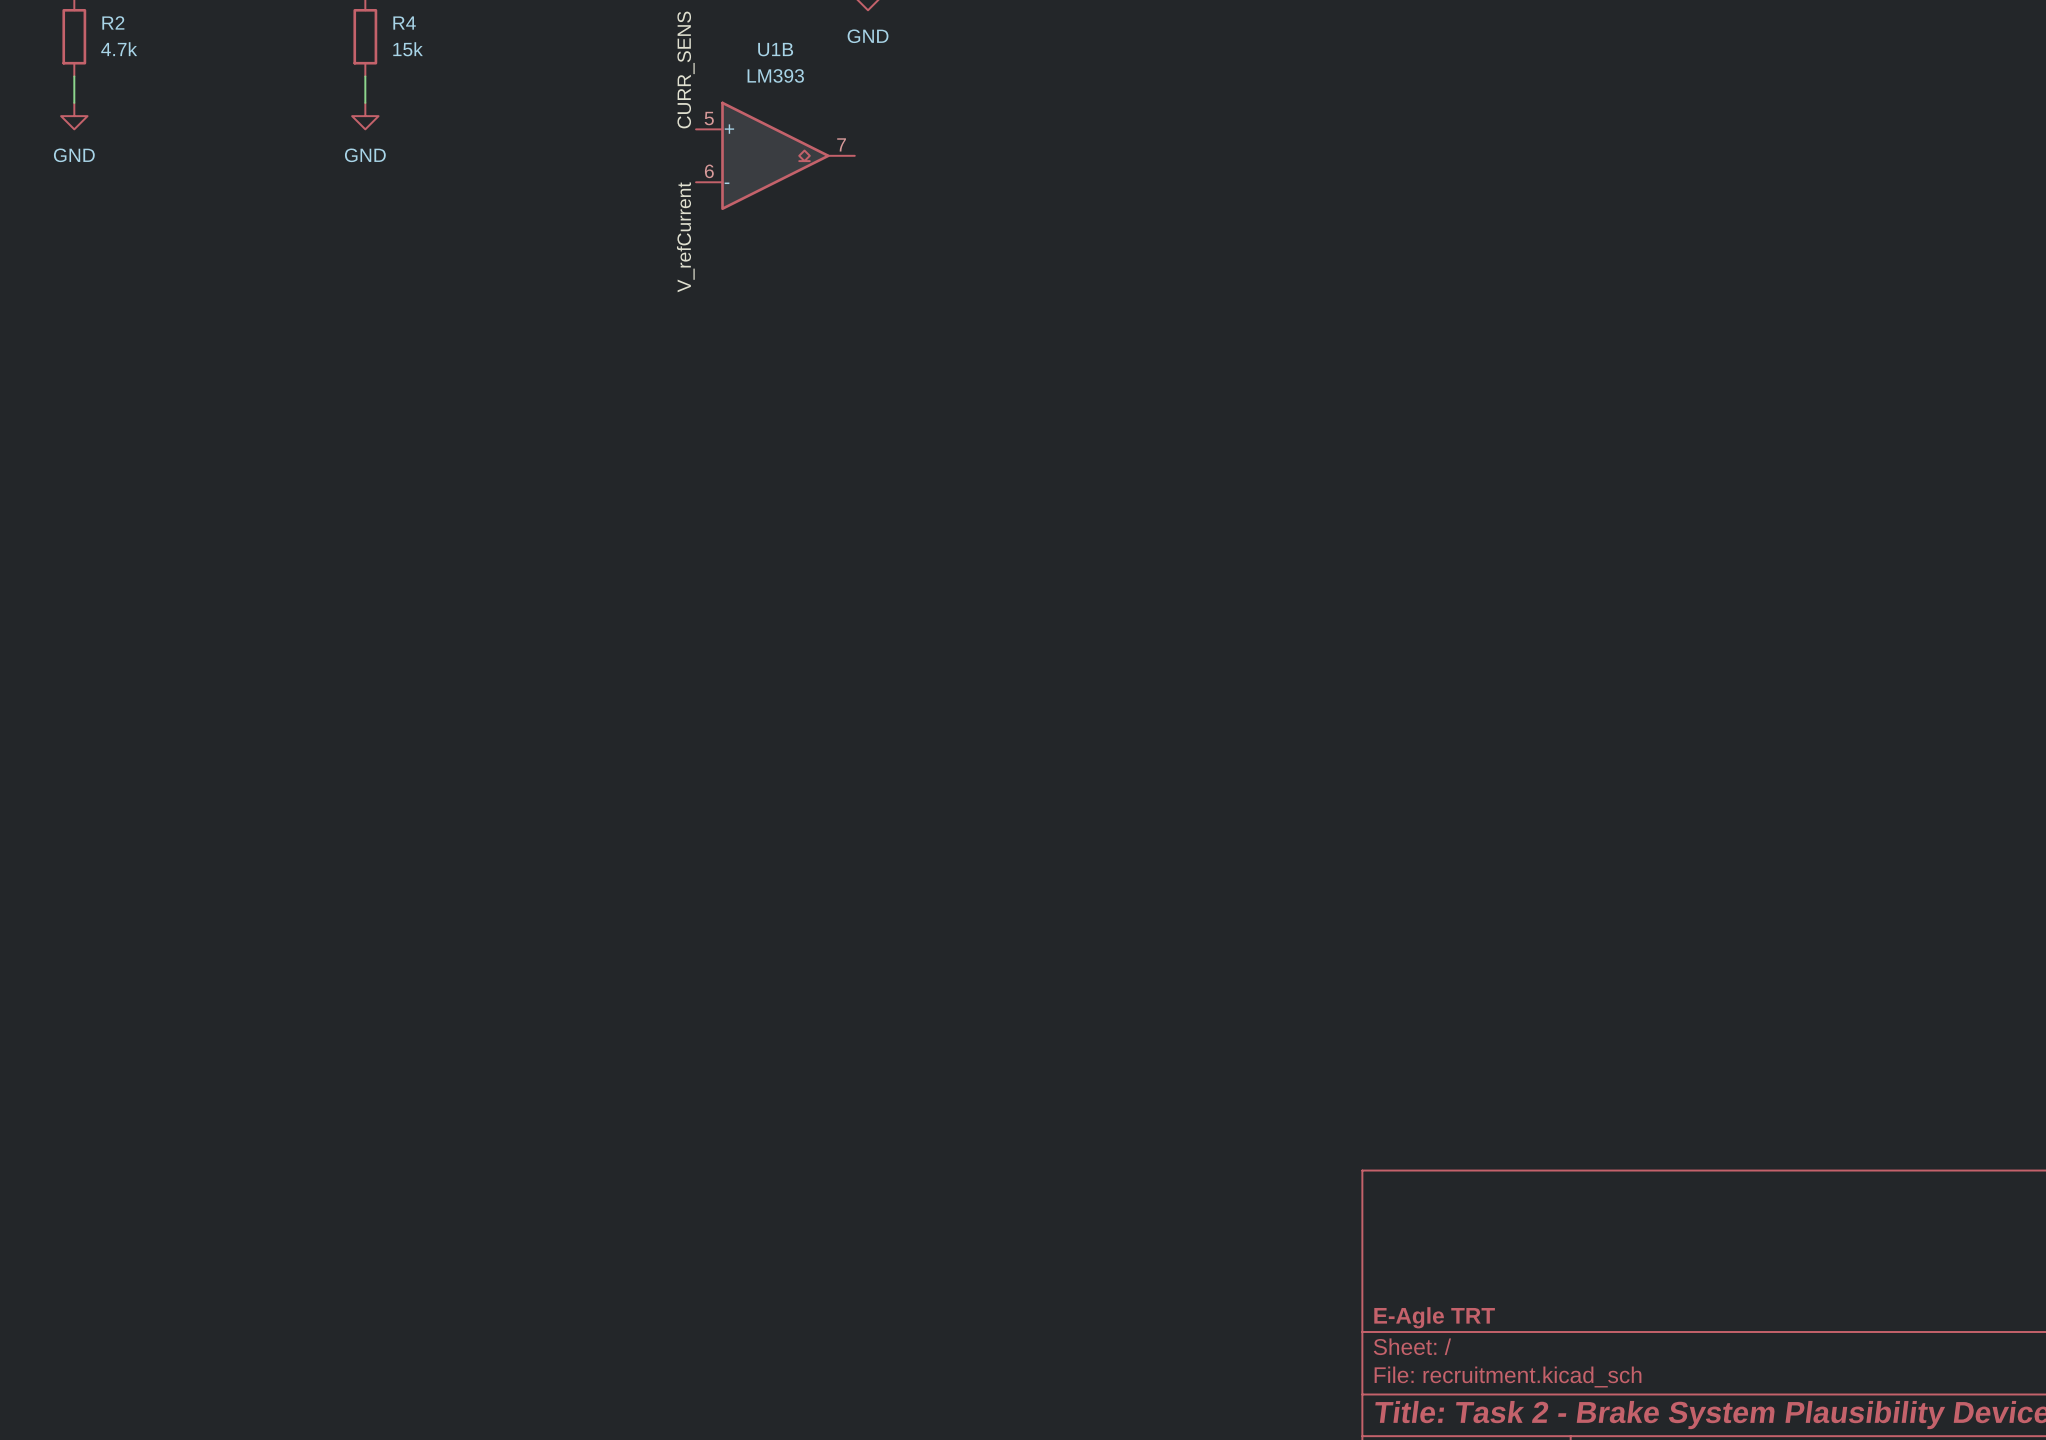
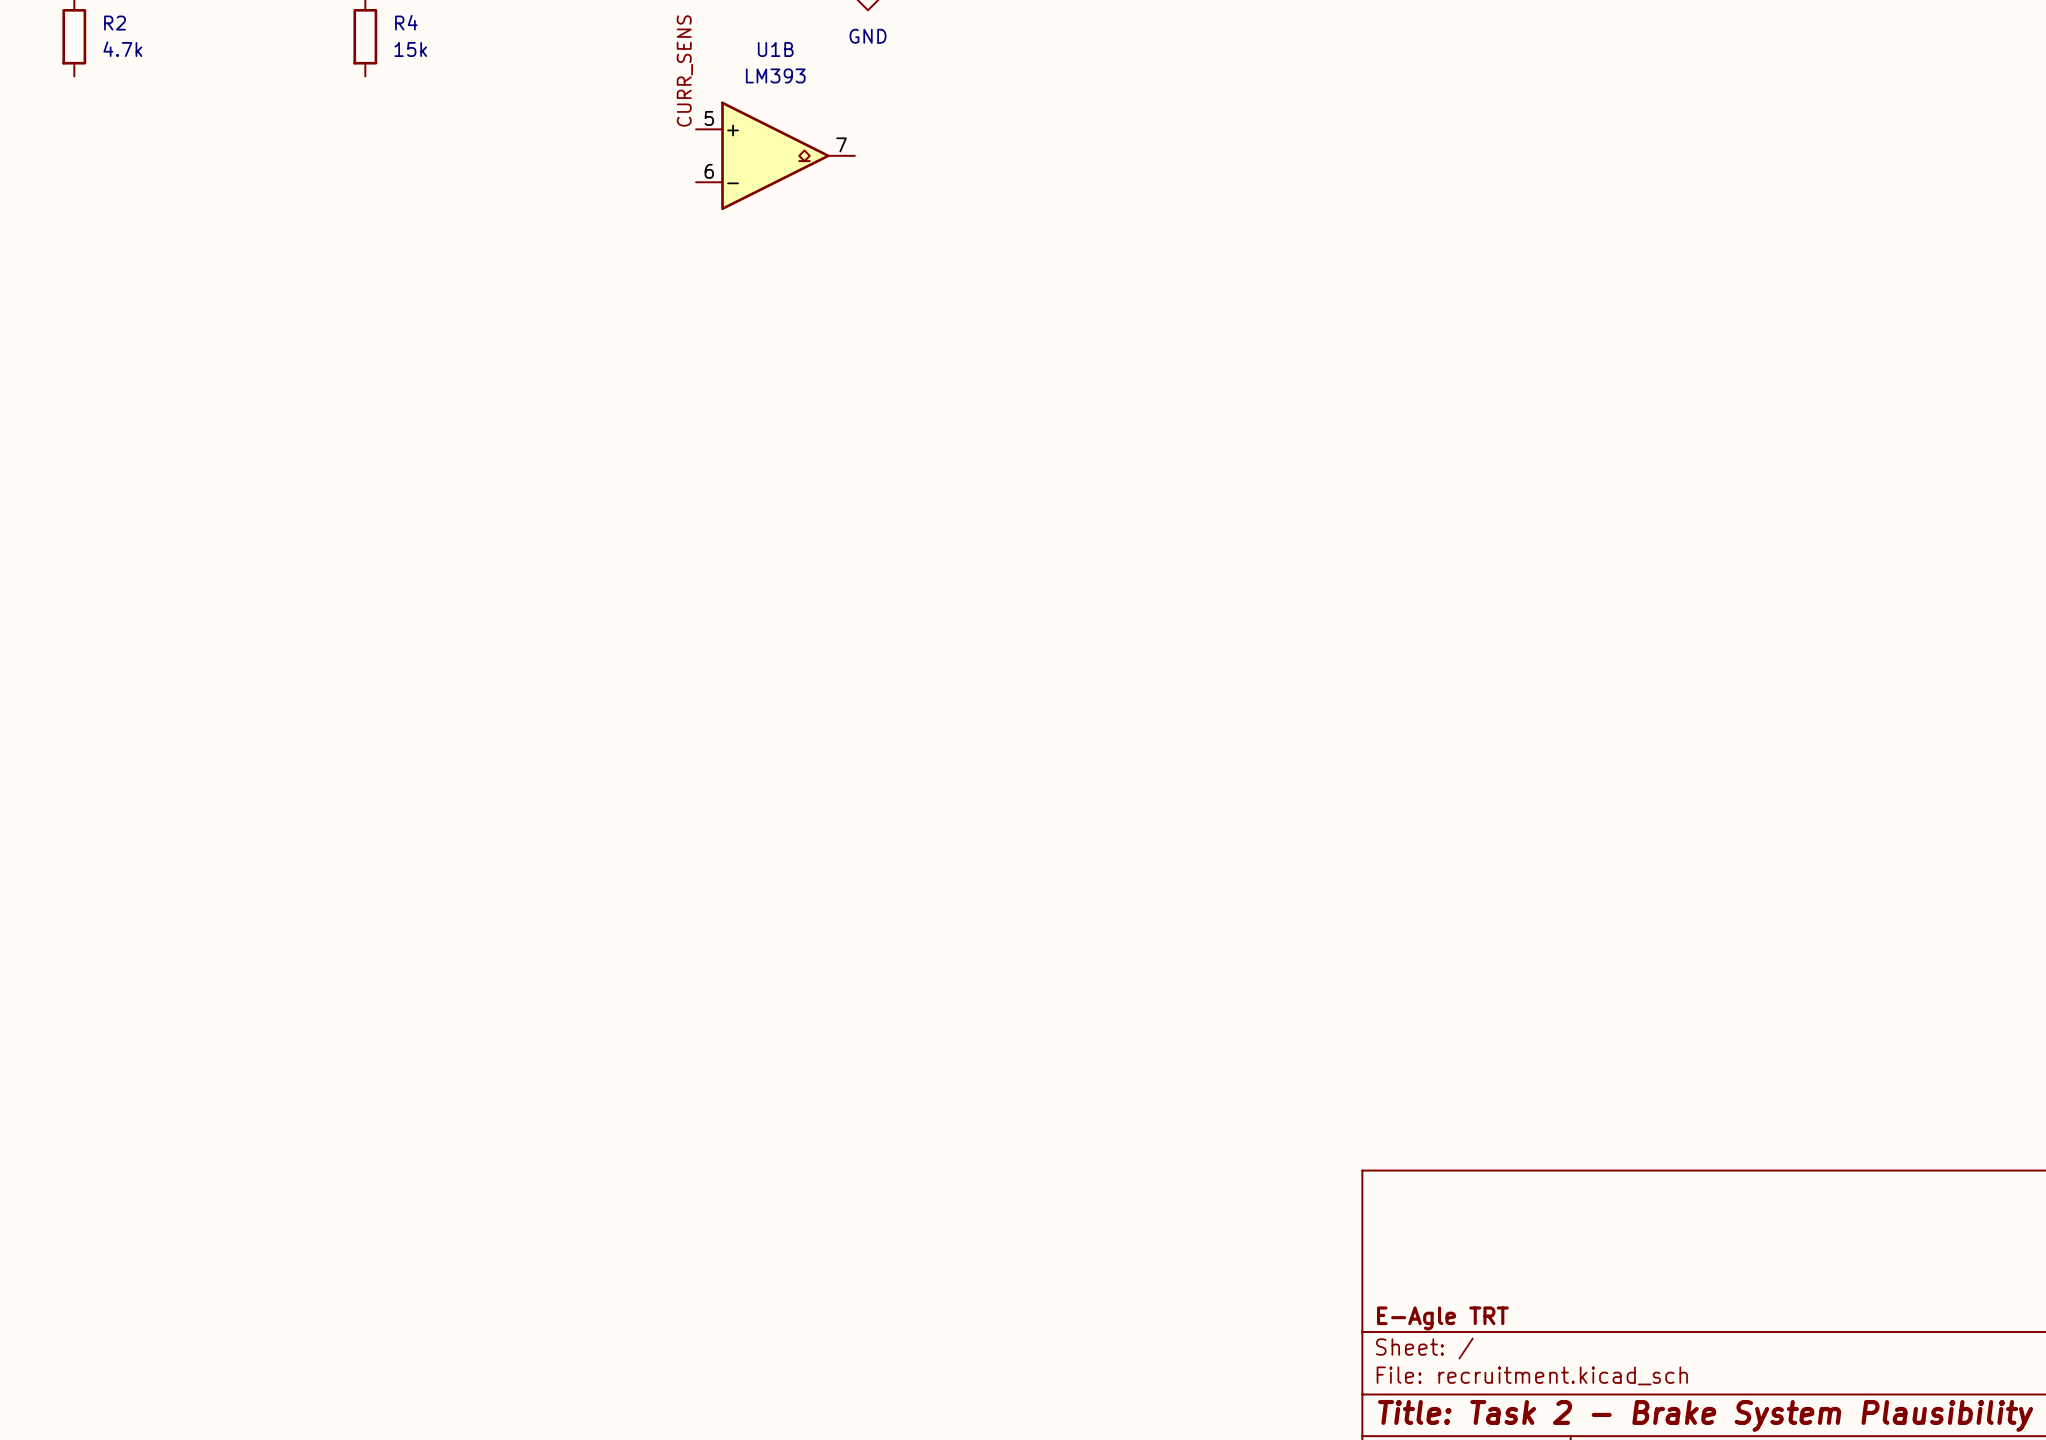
wire: (74, 76) (74, 102) -> none
wire: (365, 76) (365, 102) -> none
power symbol: GND (74, 116) -> none
power symbol: GND (365, 116) -> none
label: V_refCurrent (685, 237) -> none

